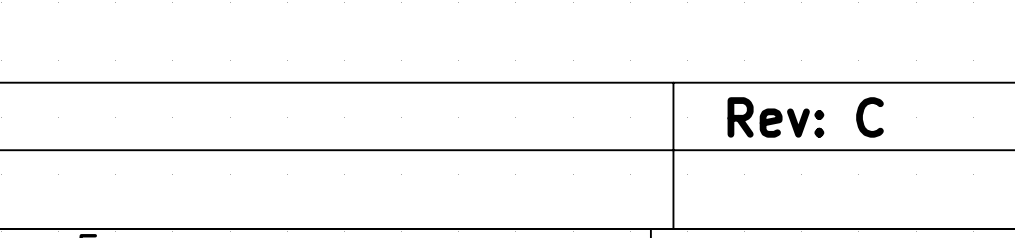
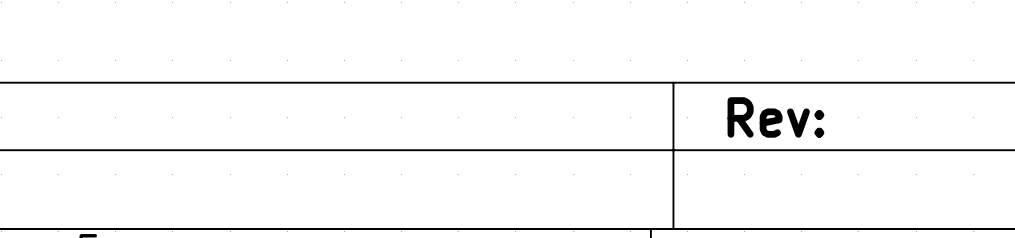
title block: Rev: C (805, 117) -> Rev: (775, 117)

